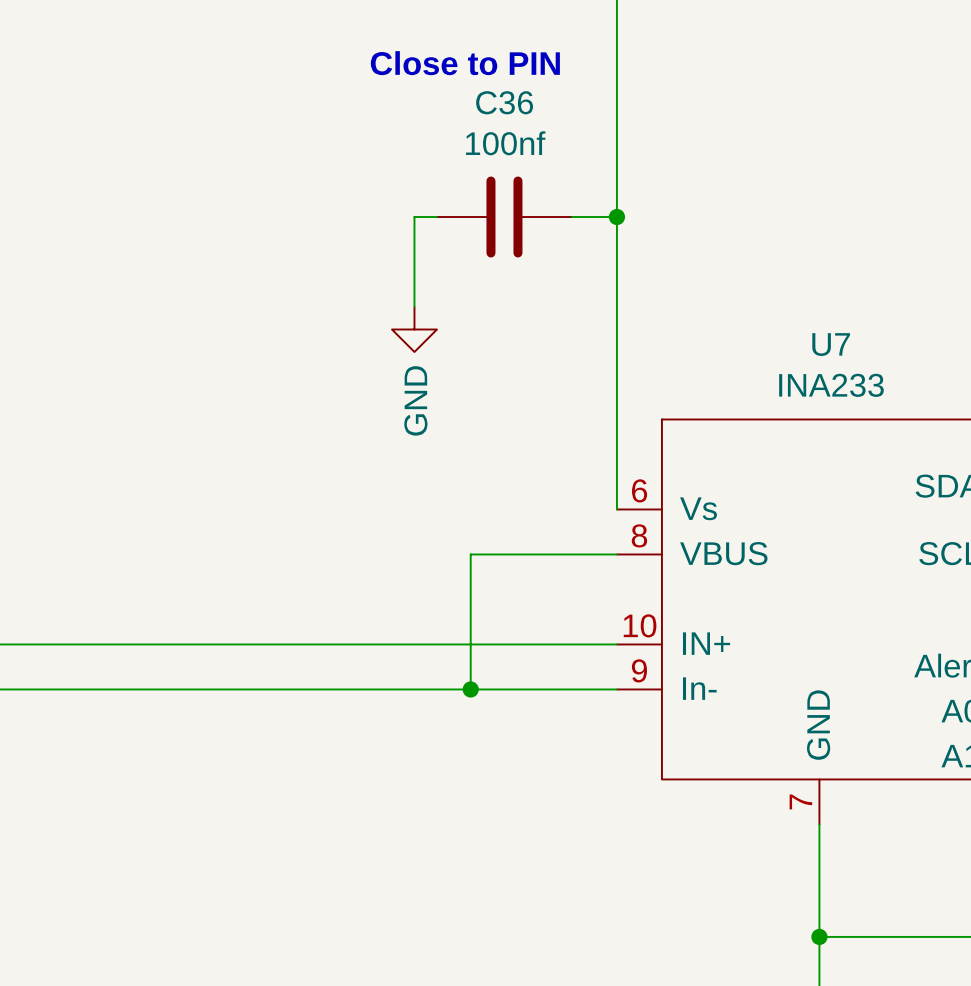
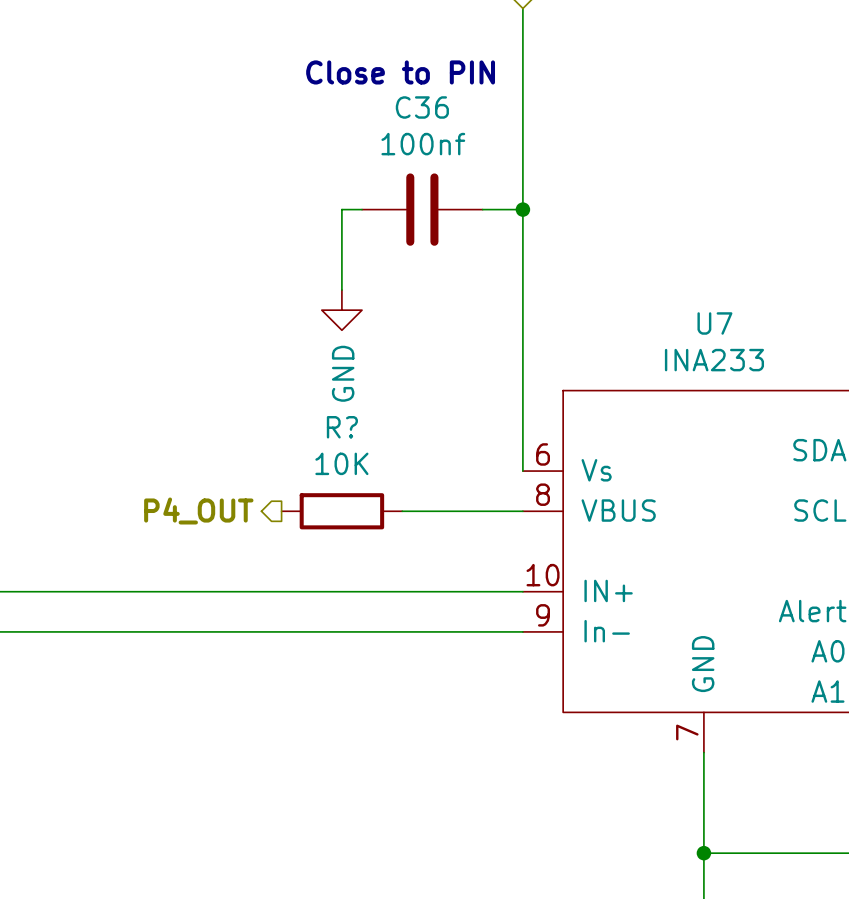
R?: none -> 10K (341, 511)
wire: (481, 554) (470, 554) (470, 689) -> none
hierarchical label: none -> P4_OUT (198, 511)
junction: (470, 689) -> none

